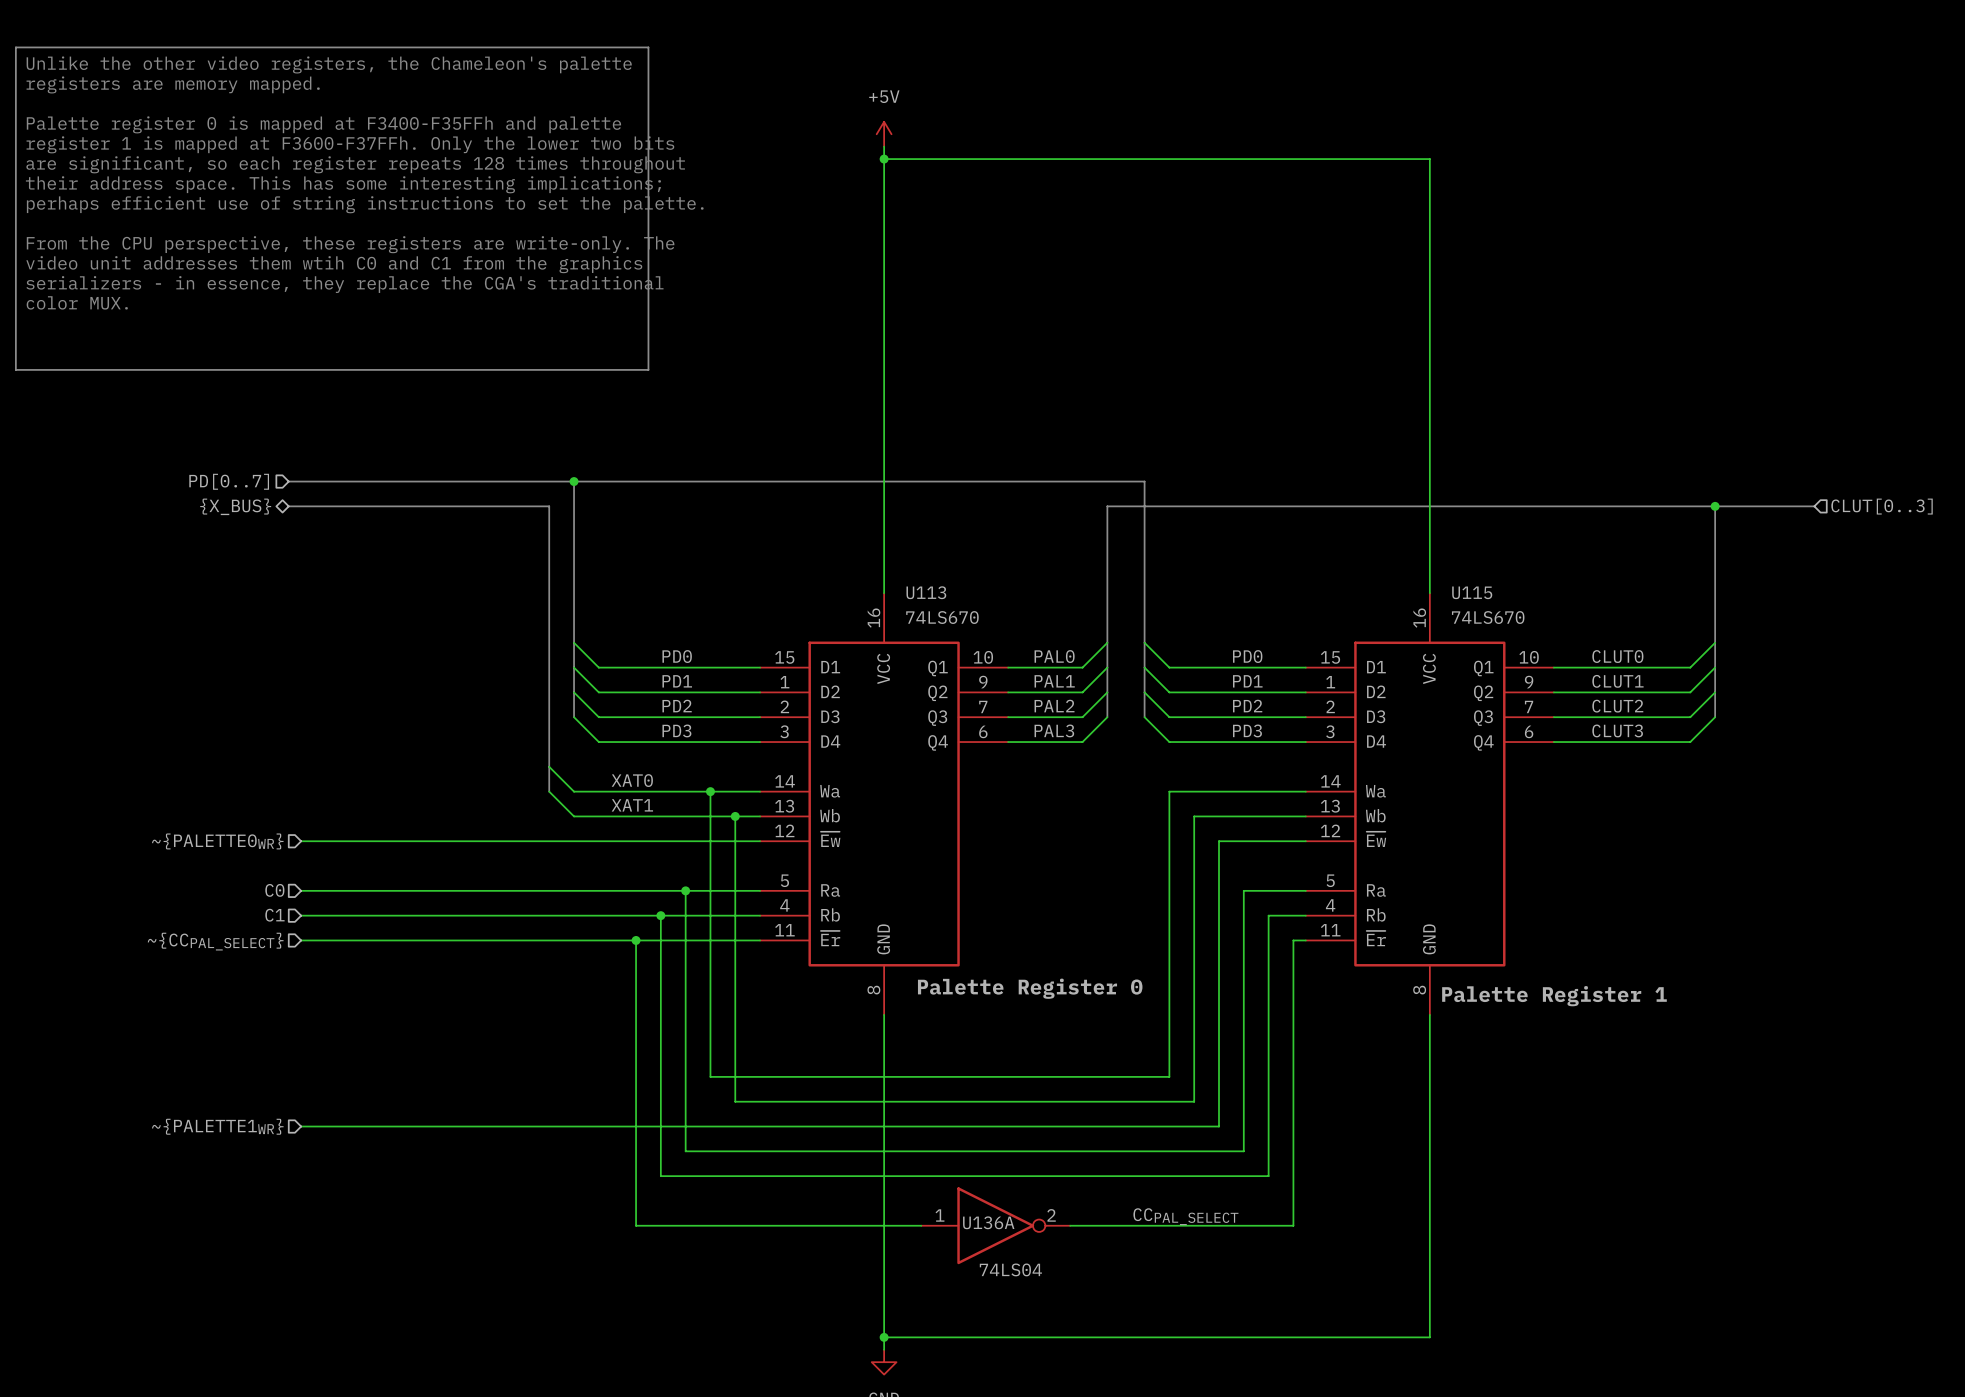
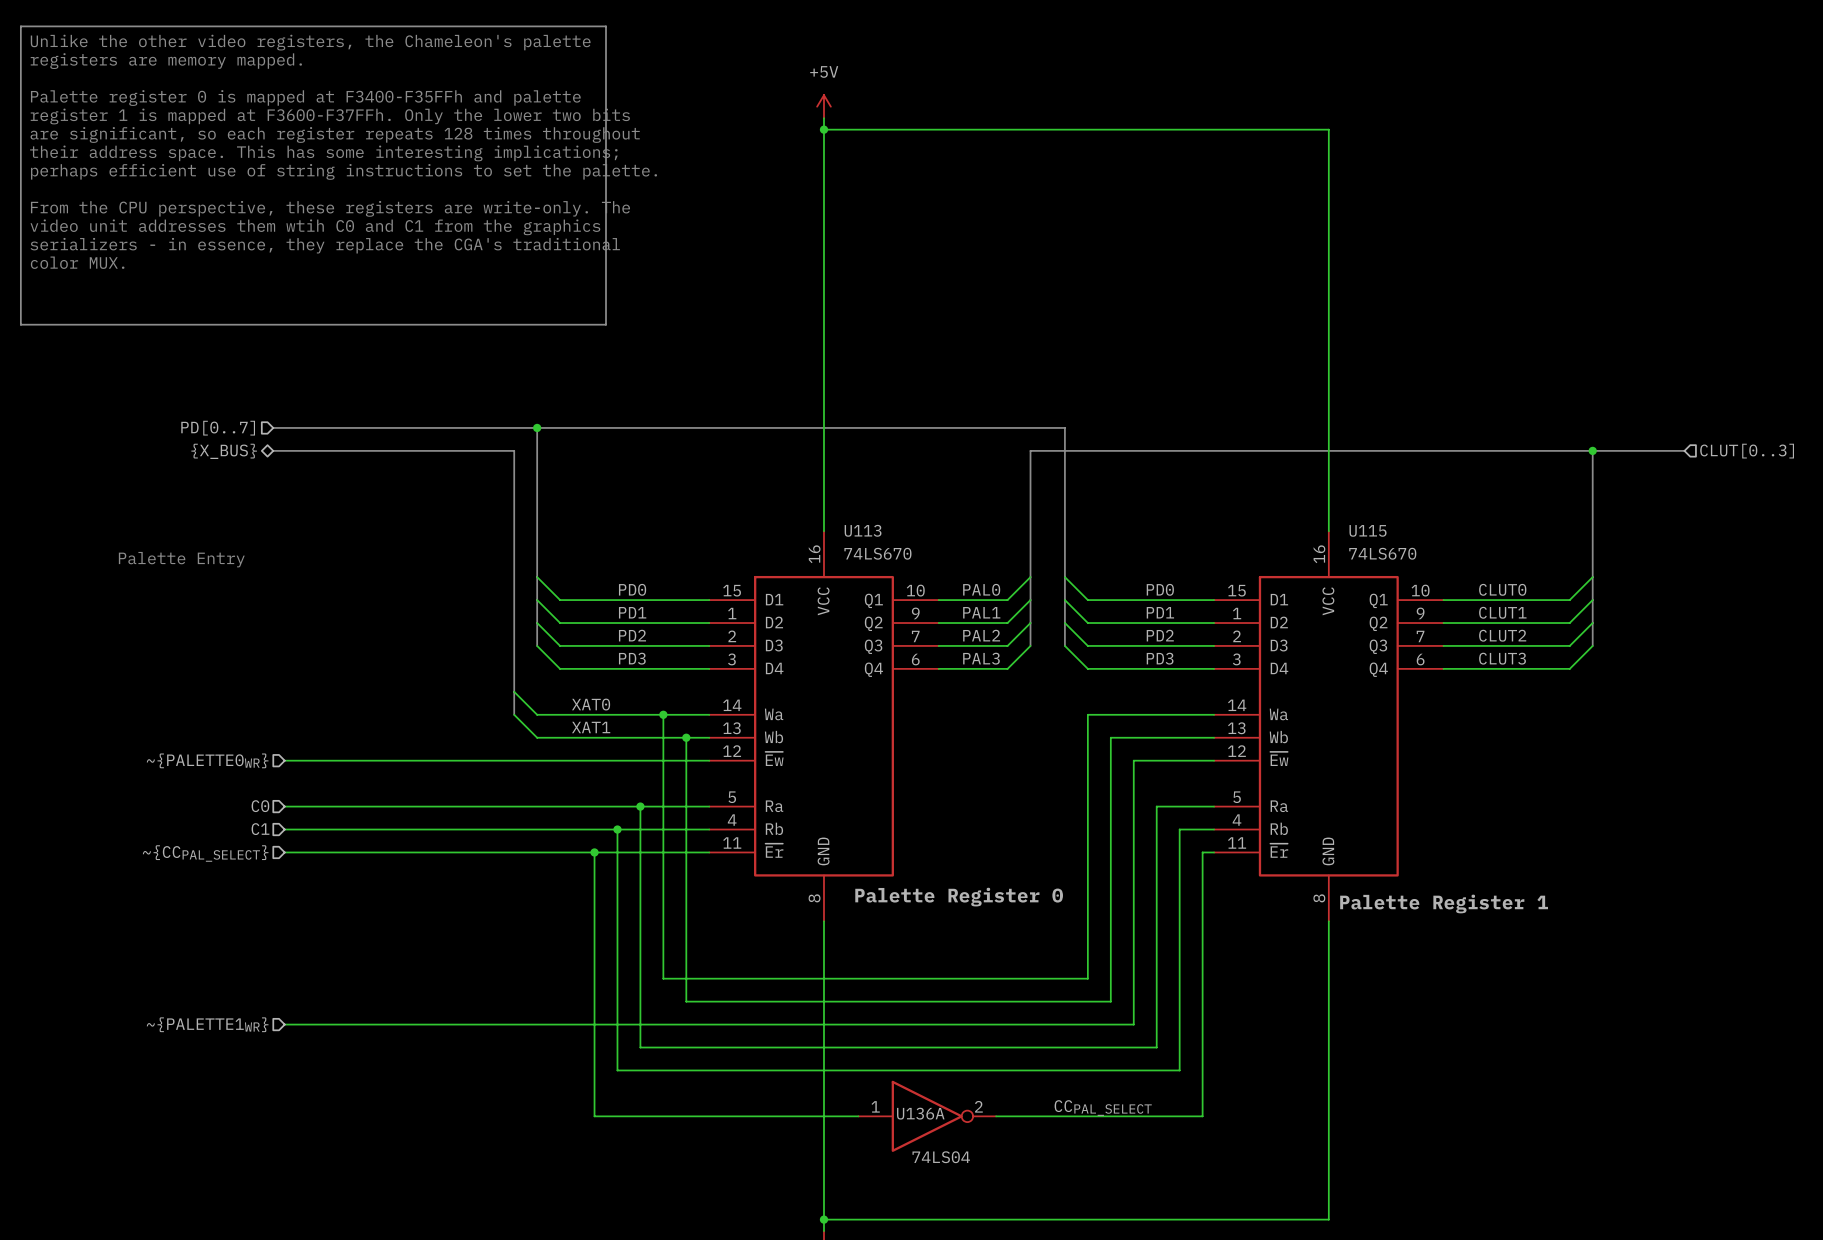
text: none -> Palette Entry (181, 559)

